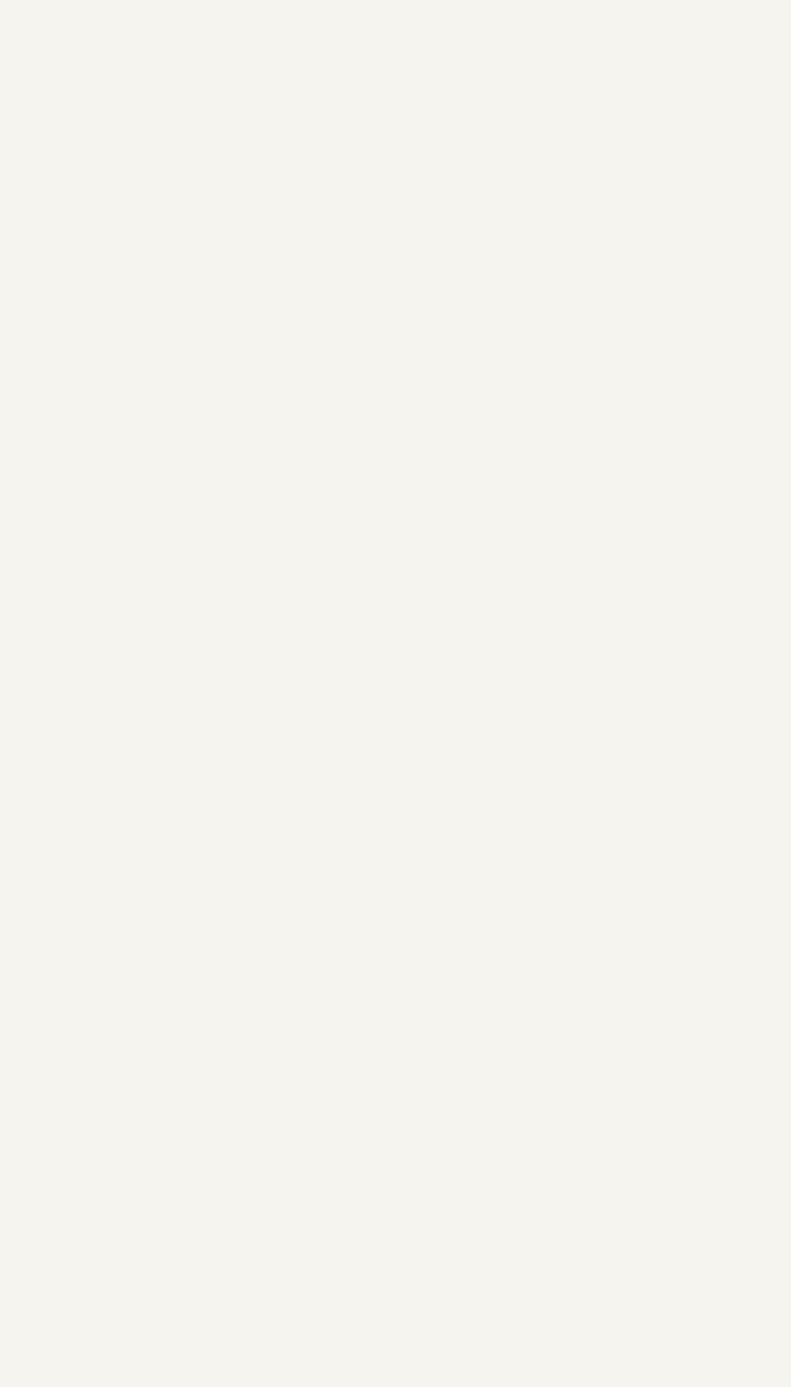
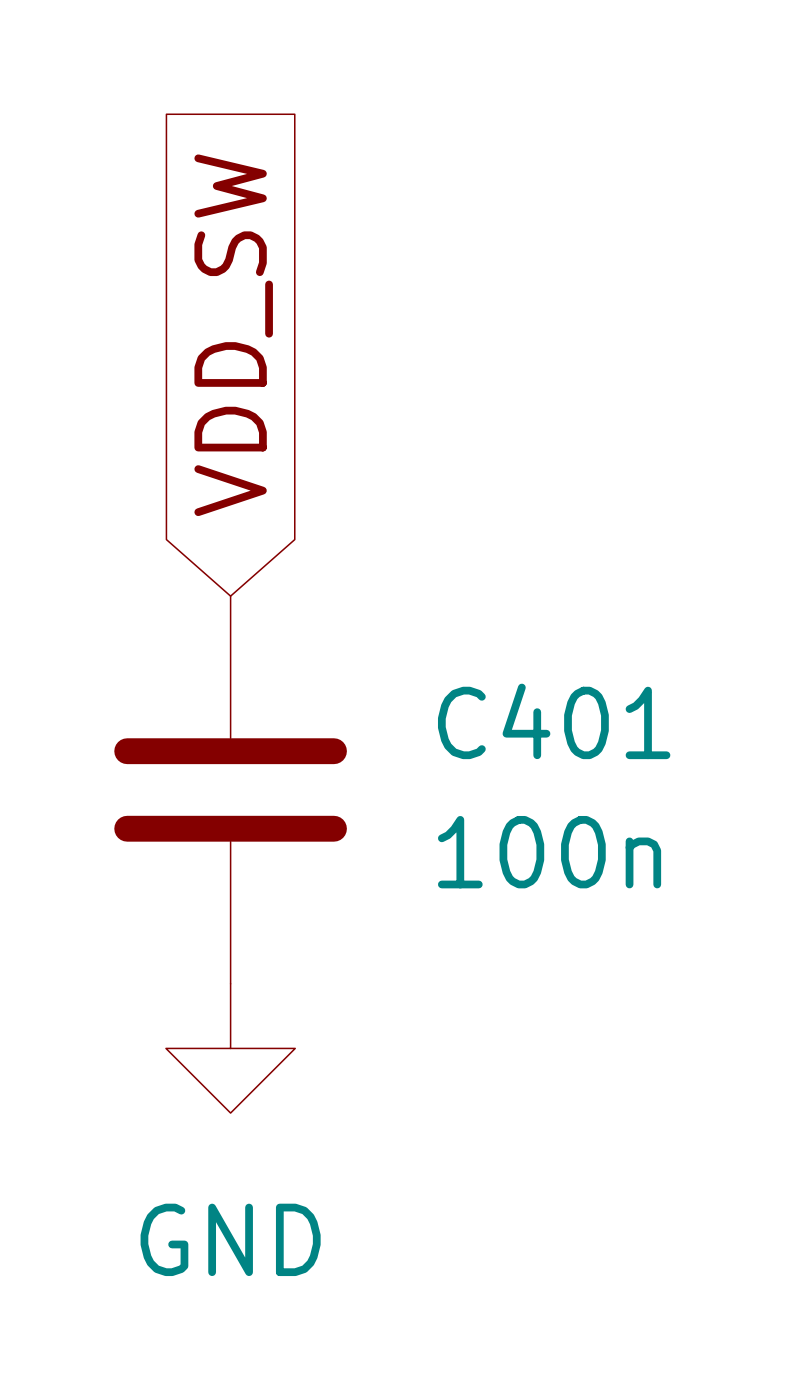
global label: none -> VDD_SW (233, 335)
C401: none -> 100n (230, 789)
power symbol: none -> GND (230, 1048)

